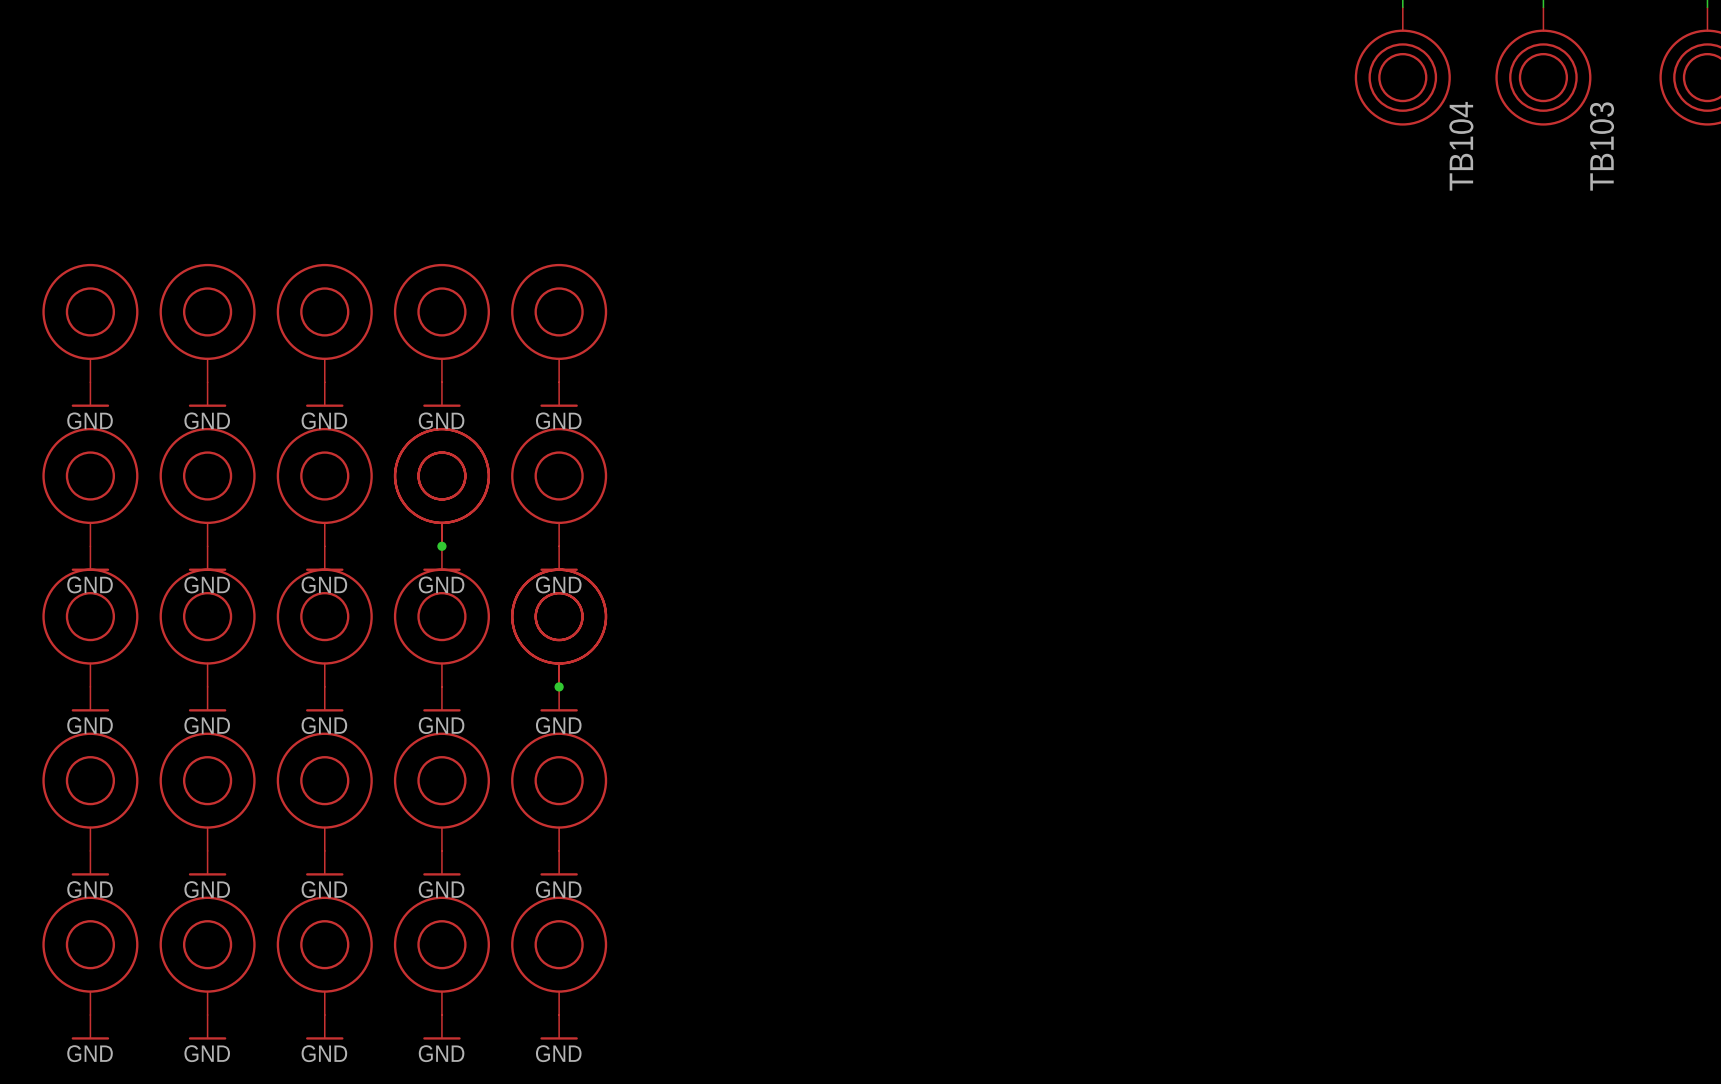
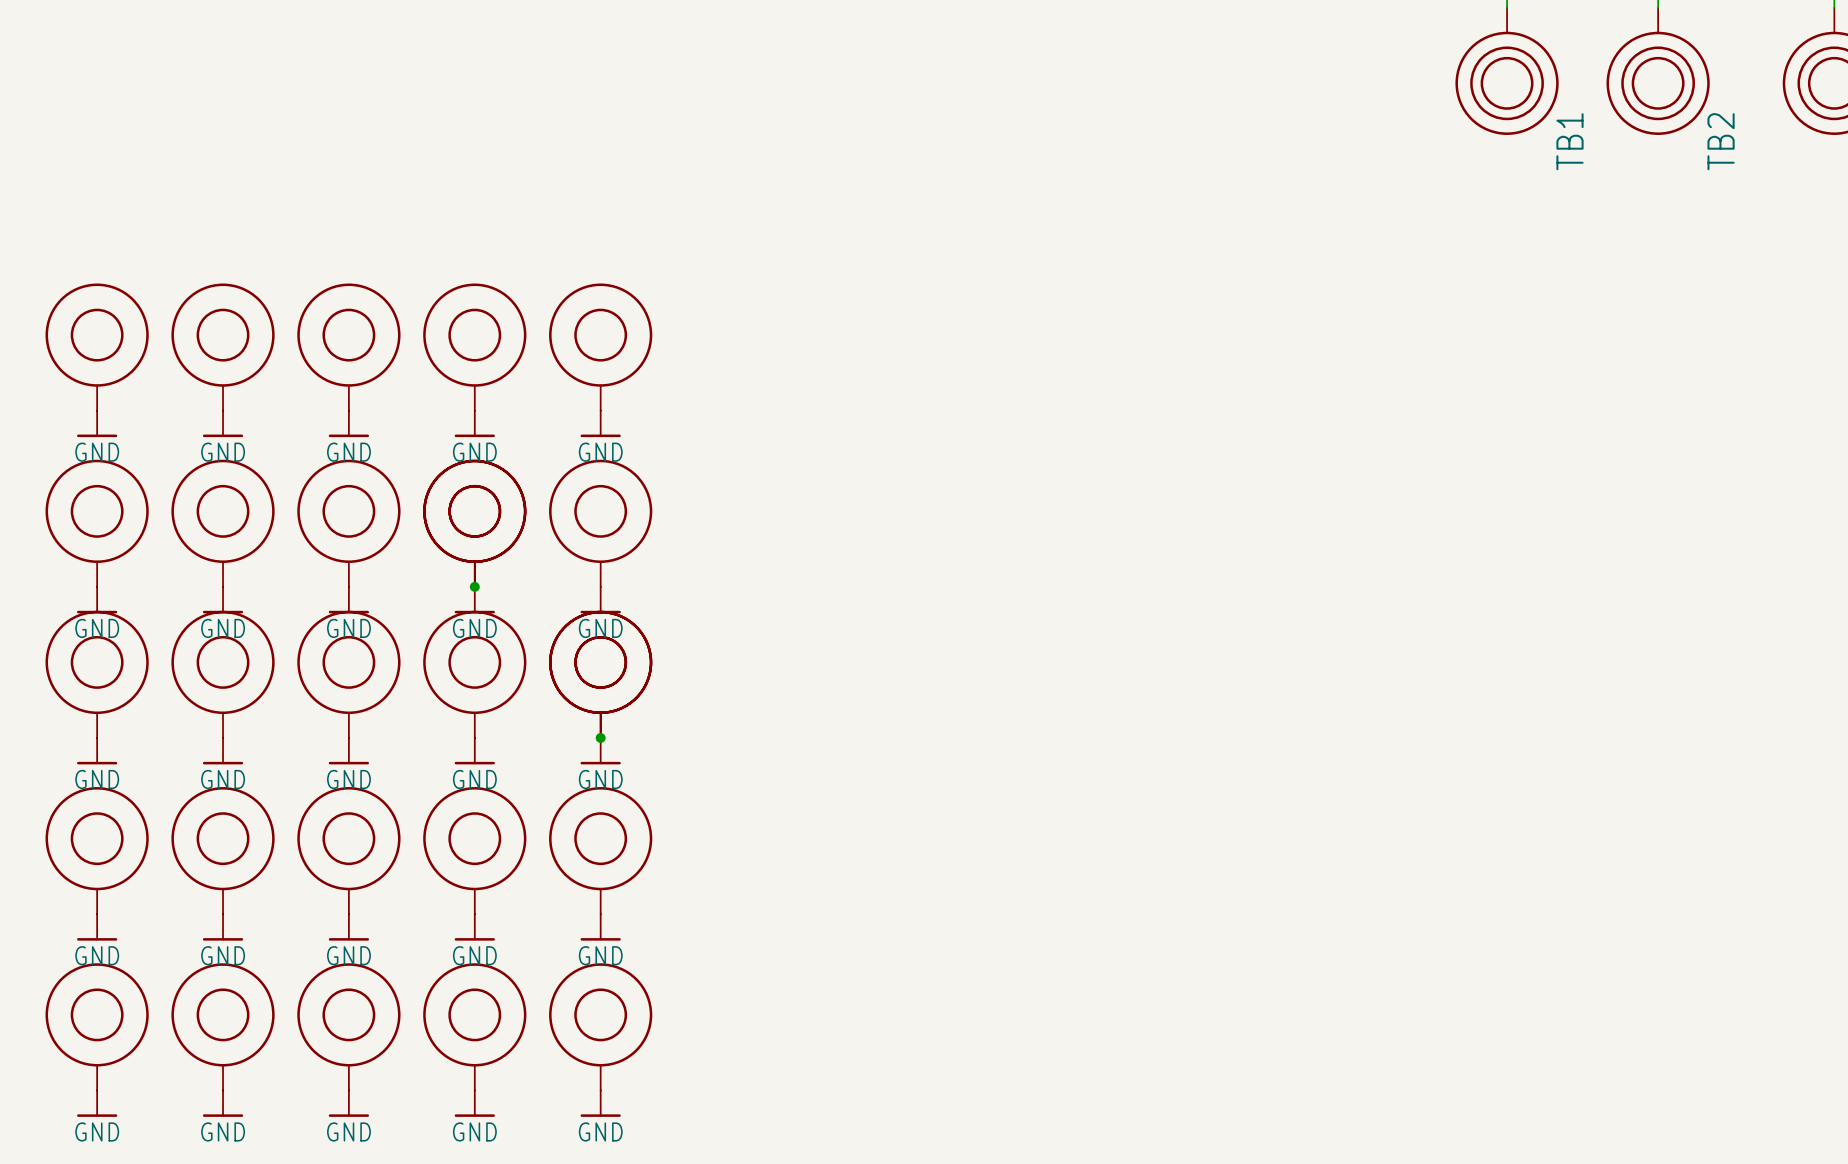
TB104 name: TB104 (1461, 146) -> TB1 (1569, 141)
TB103 name: TB103 (1602, 146) -> TB2 (1721, 141)

